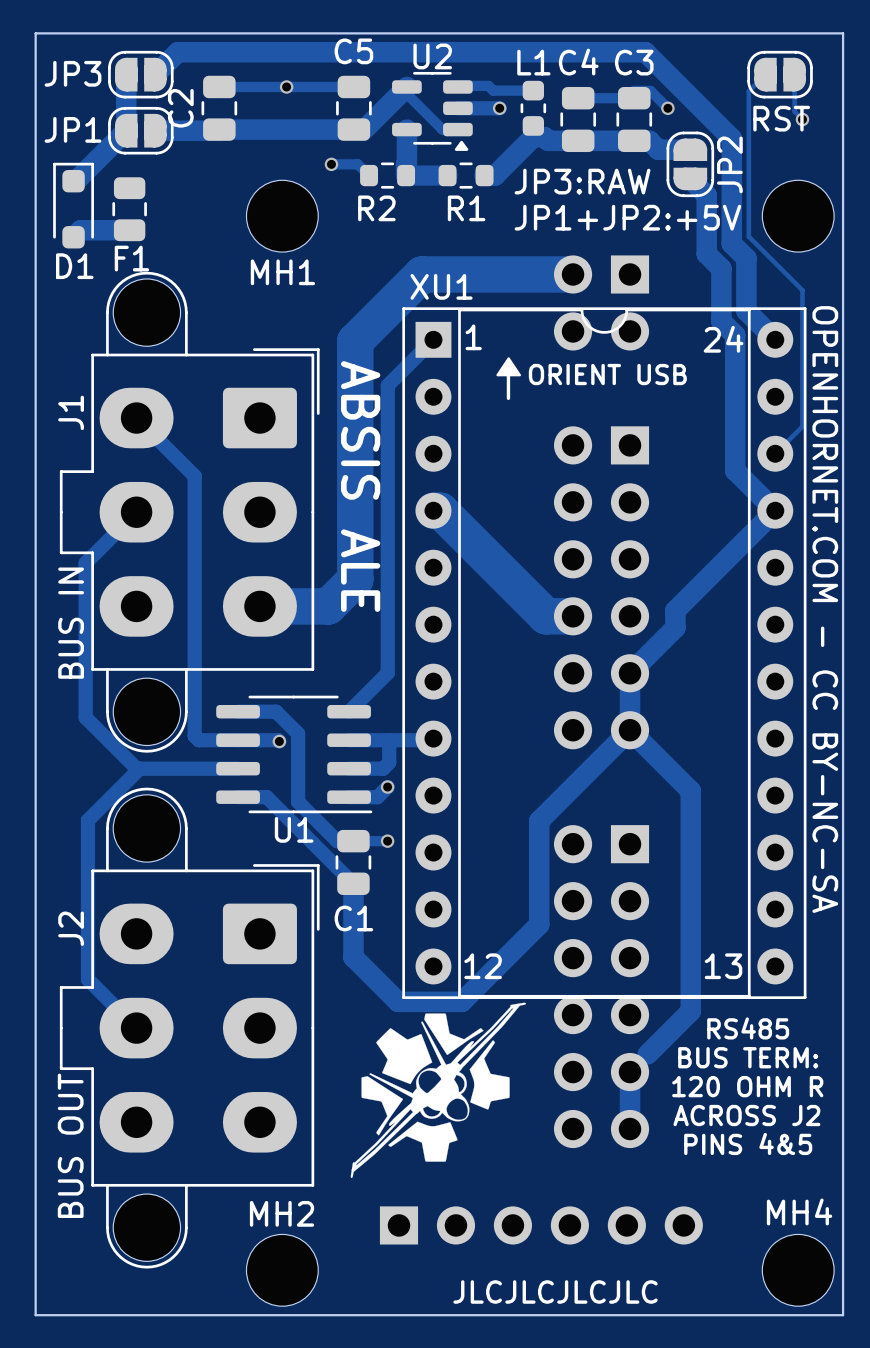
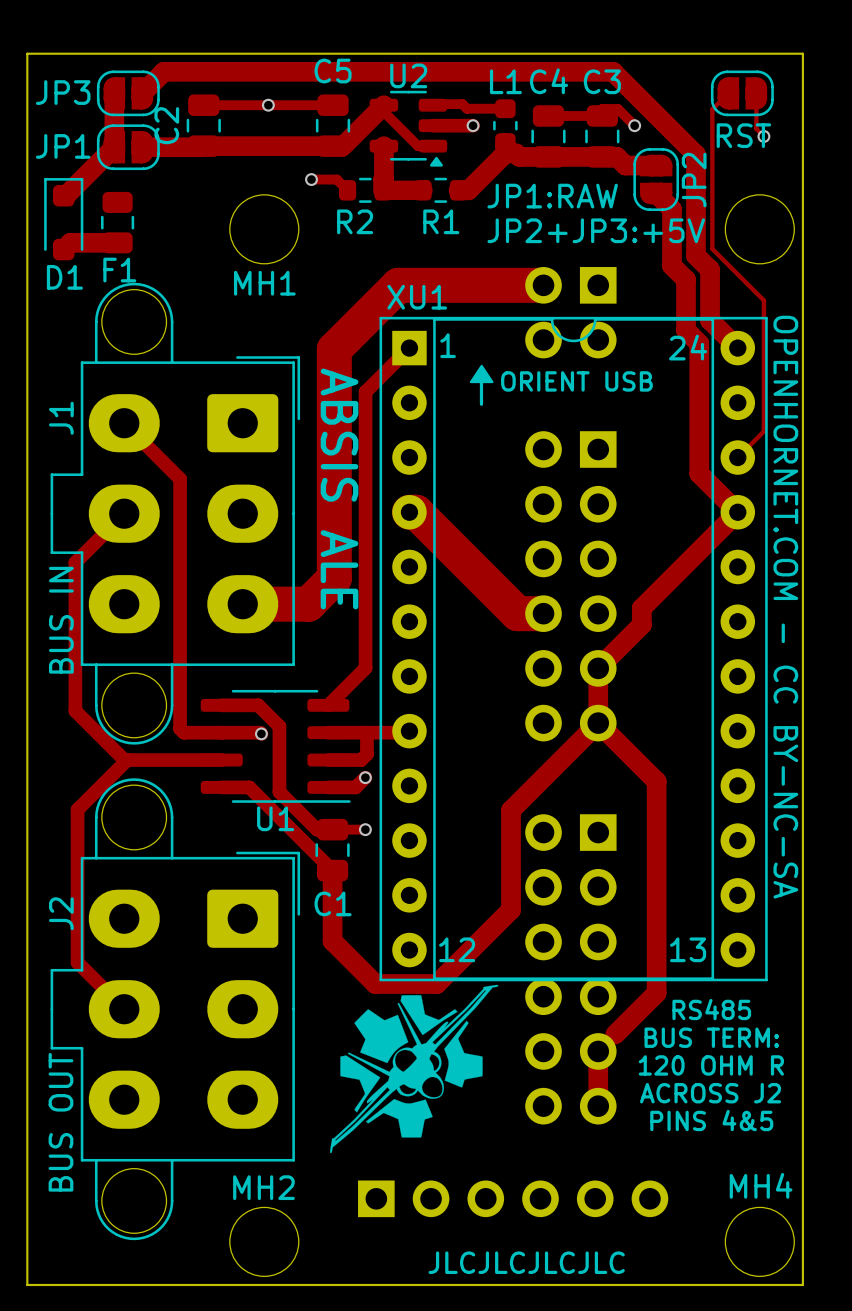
text: JP3:RAW (582, 181) -> JP1:RAW (552, 196)
text: JP1+JP2:+5V (627, 217) -> JP2+JP3:+5V (596, 230)

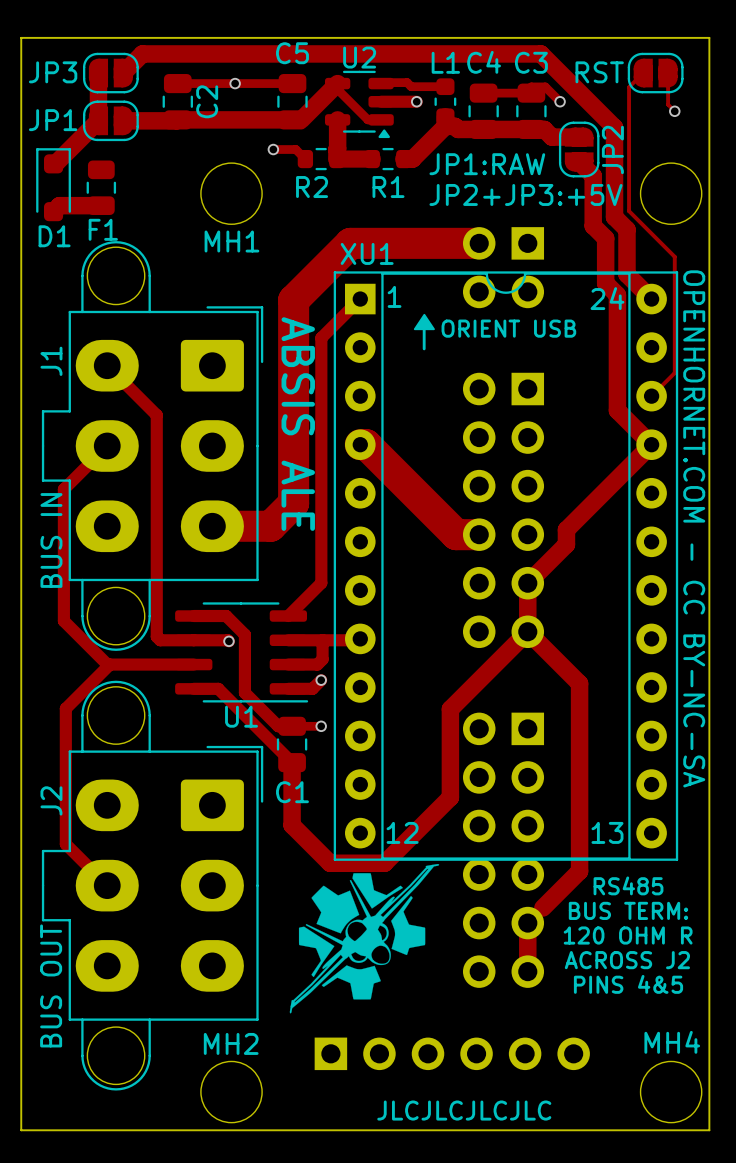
C2 name position: C2 (166, 125) -> C2 (207, 101)
part value position: RST (743, 135) -> RST (599, 72)

